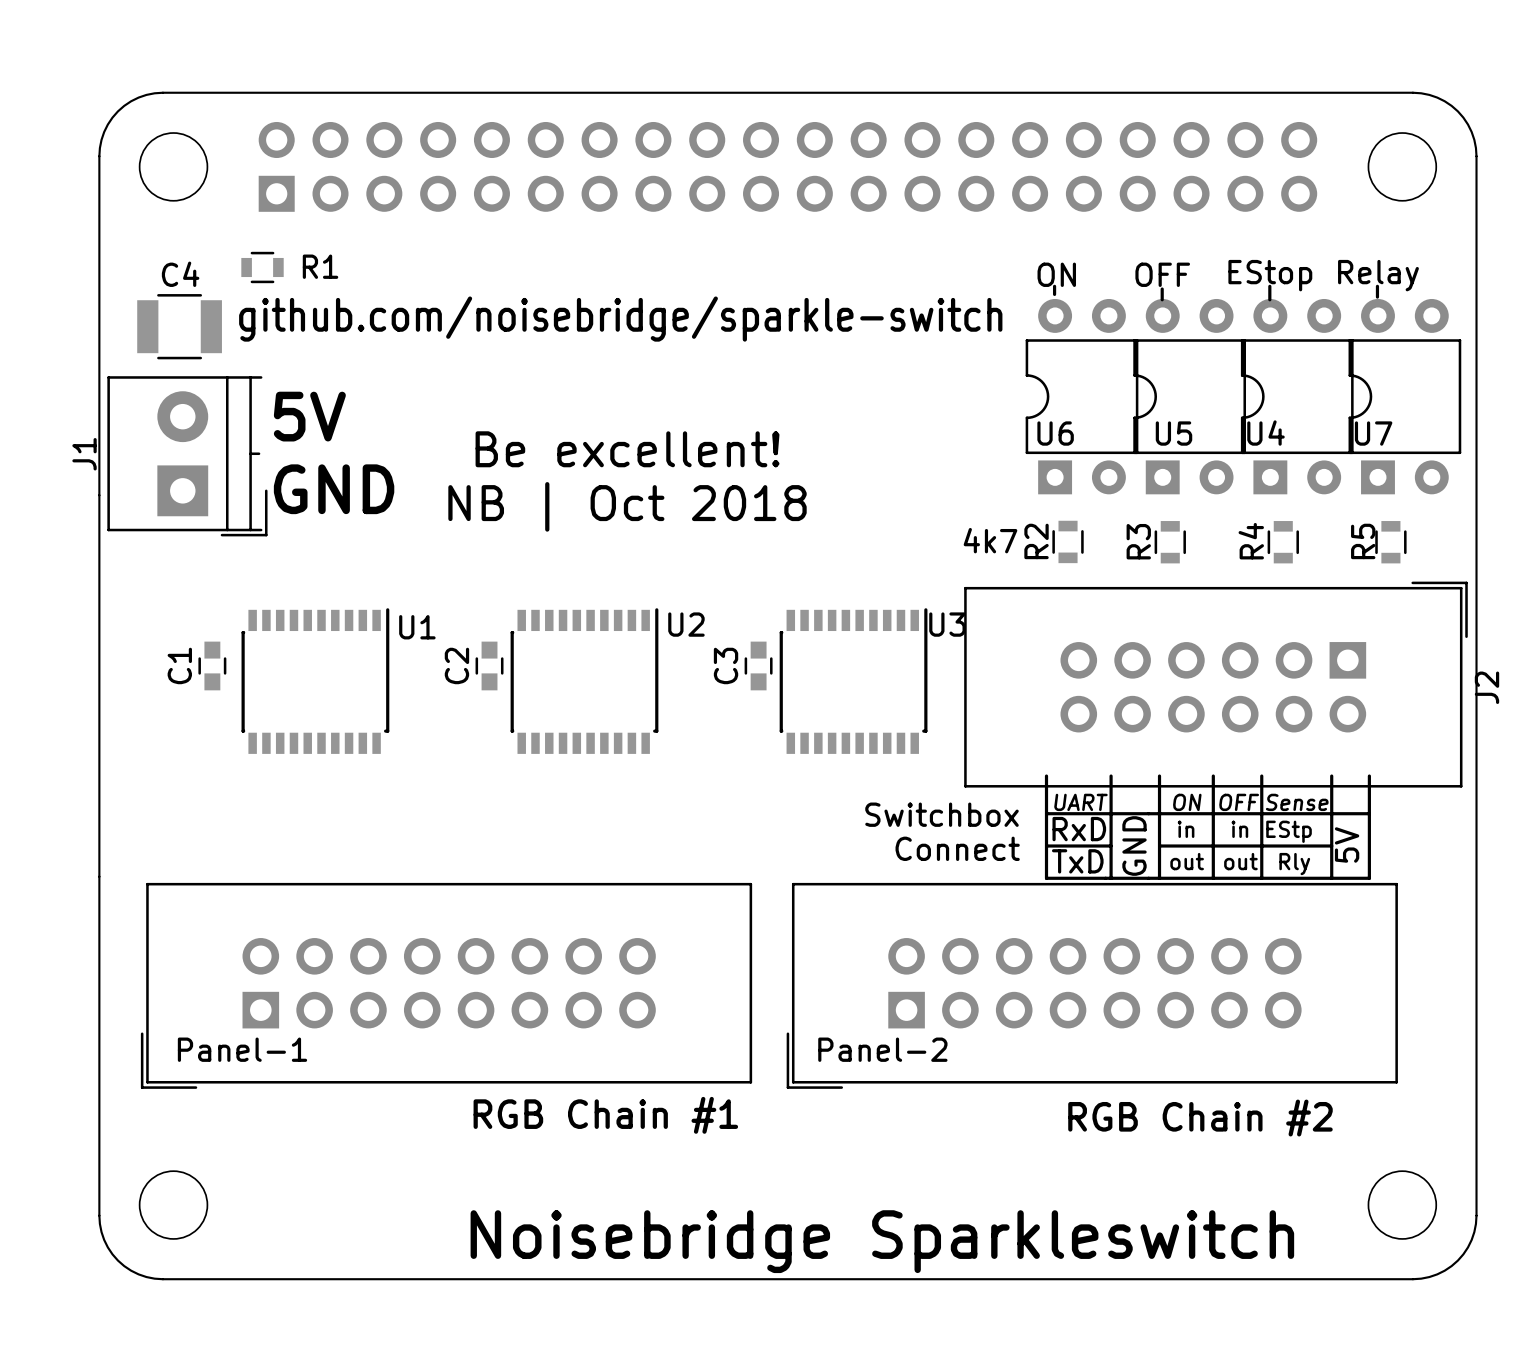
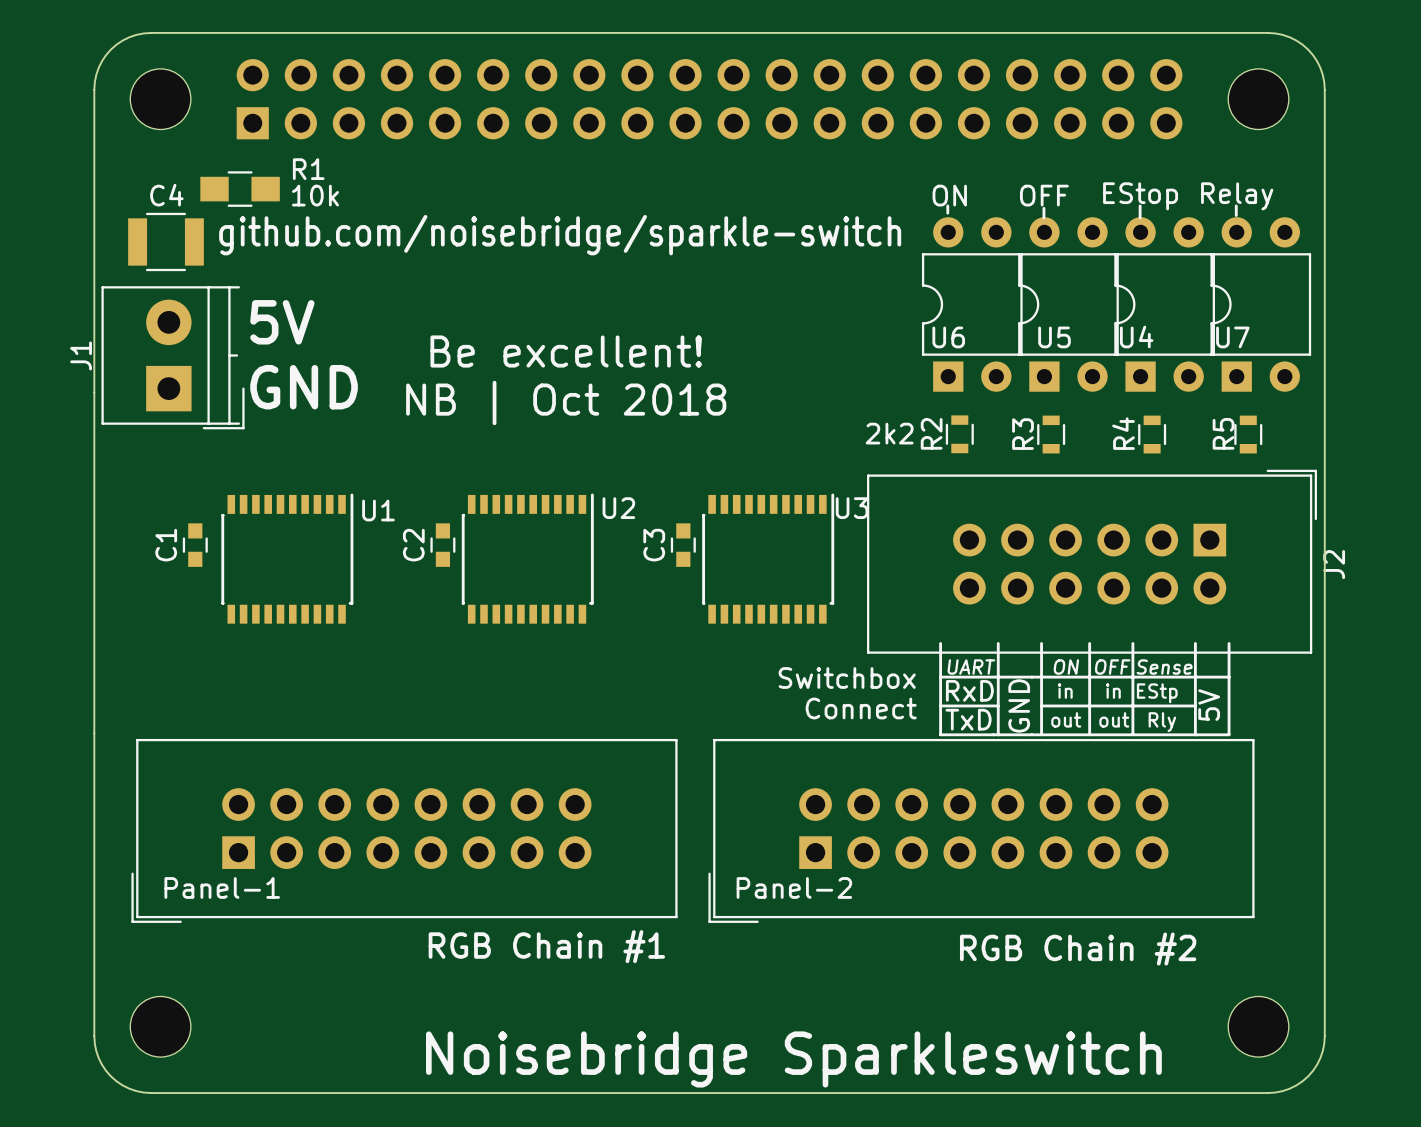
R1 footprint: [241, 251, 284, 284] -> [200, 171, 280, 207]
R1 value: none -> 10k (315, 195)
R2 value: 4k7 (990, 540) -> 2k2 (889, 433)

